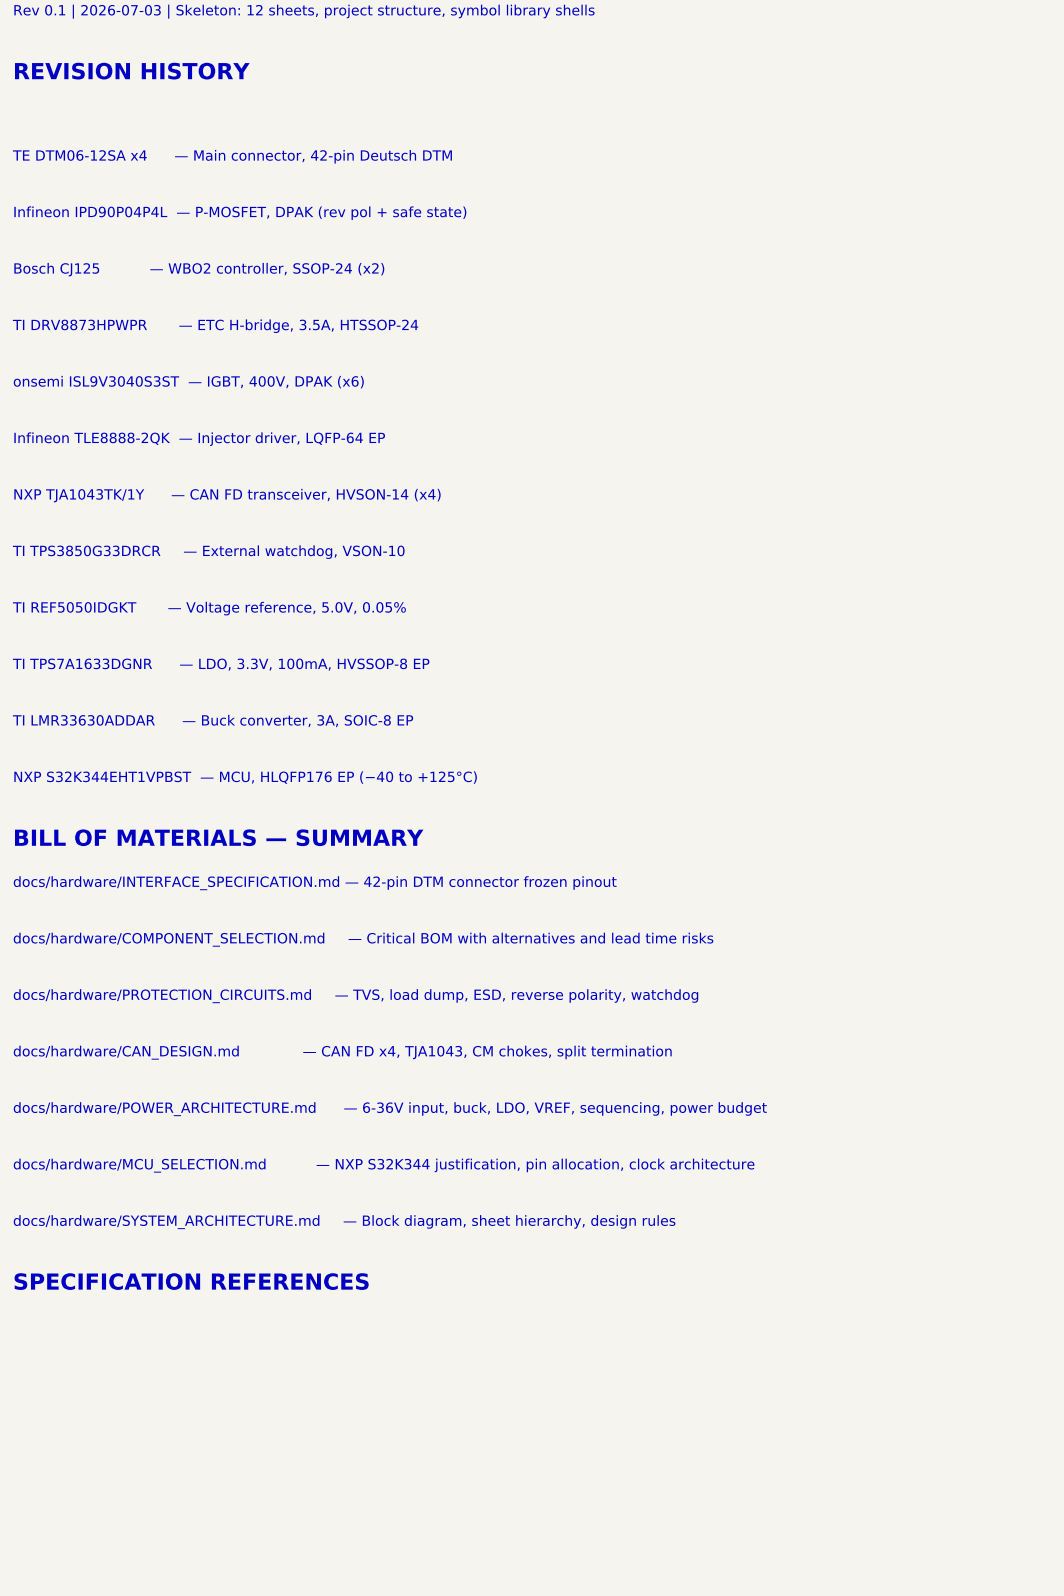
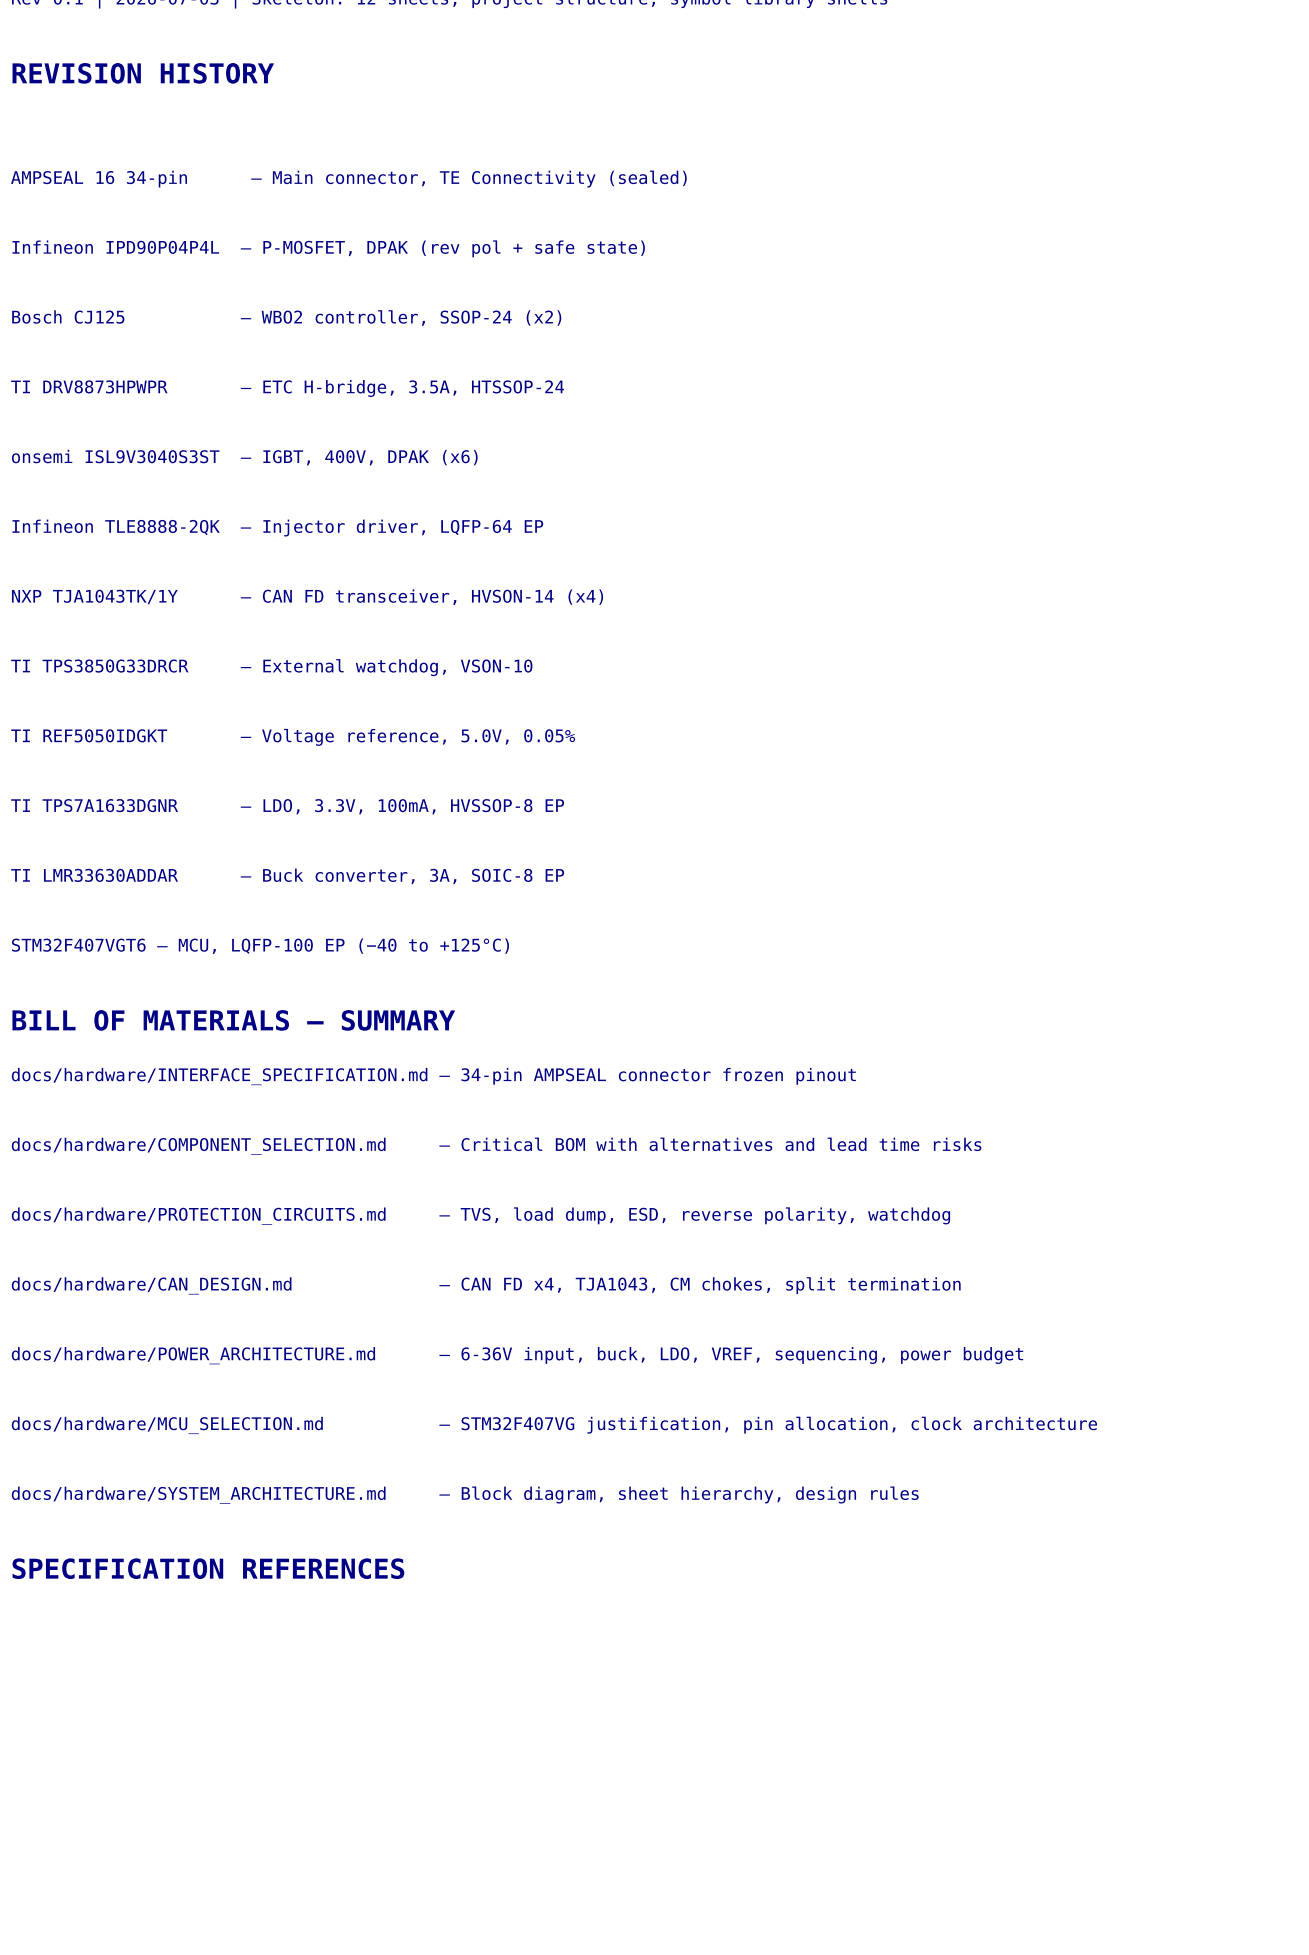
text: TE DTM06-12SA x4 — Main connector, 42-pin Deutsch DTM (232, 156) -> AMPSEAL 16 34-pin — Main connector, TE Connectivity (sealed) (348, 179)
text: NXP S32K344EHT1VPBST — MCU, HLQFP176 EP (−40 to +125°C) (245, 777) -> STM32F407VGT6 — MCU, LQFP-100 EP (−40 to +125°C) (260, 946)
text: docs/hardware/INTERFACE_SPECIFICATION.md — 42-pin DTM connector frozen pinout (315, 883) -> docs/hardware/INTERFACE_SPECIFICATION.md — 34-pin AMPSEAL connector frozen pinout (433, 1076)
text: docs/hardware/MCU_SELECTION.md — NXP S32K344 justification, pin allocation, clock architecture (384, 1165) -> docs/hardware/MCU_SELECTION.md — STM32F407VG justification, pin allocation, clock architecture (554, 1425)

